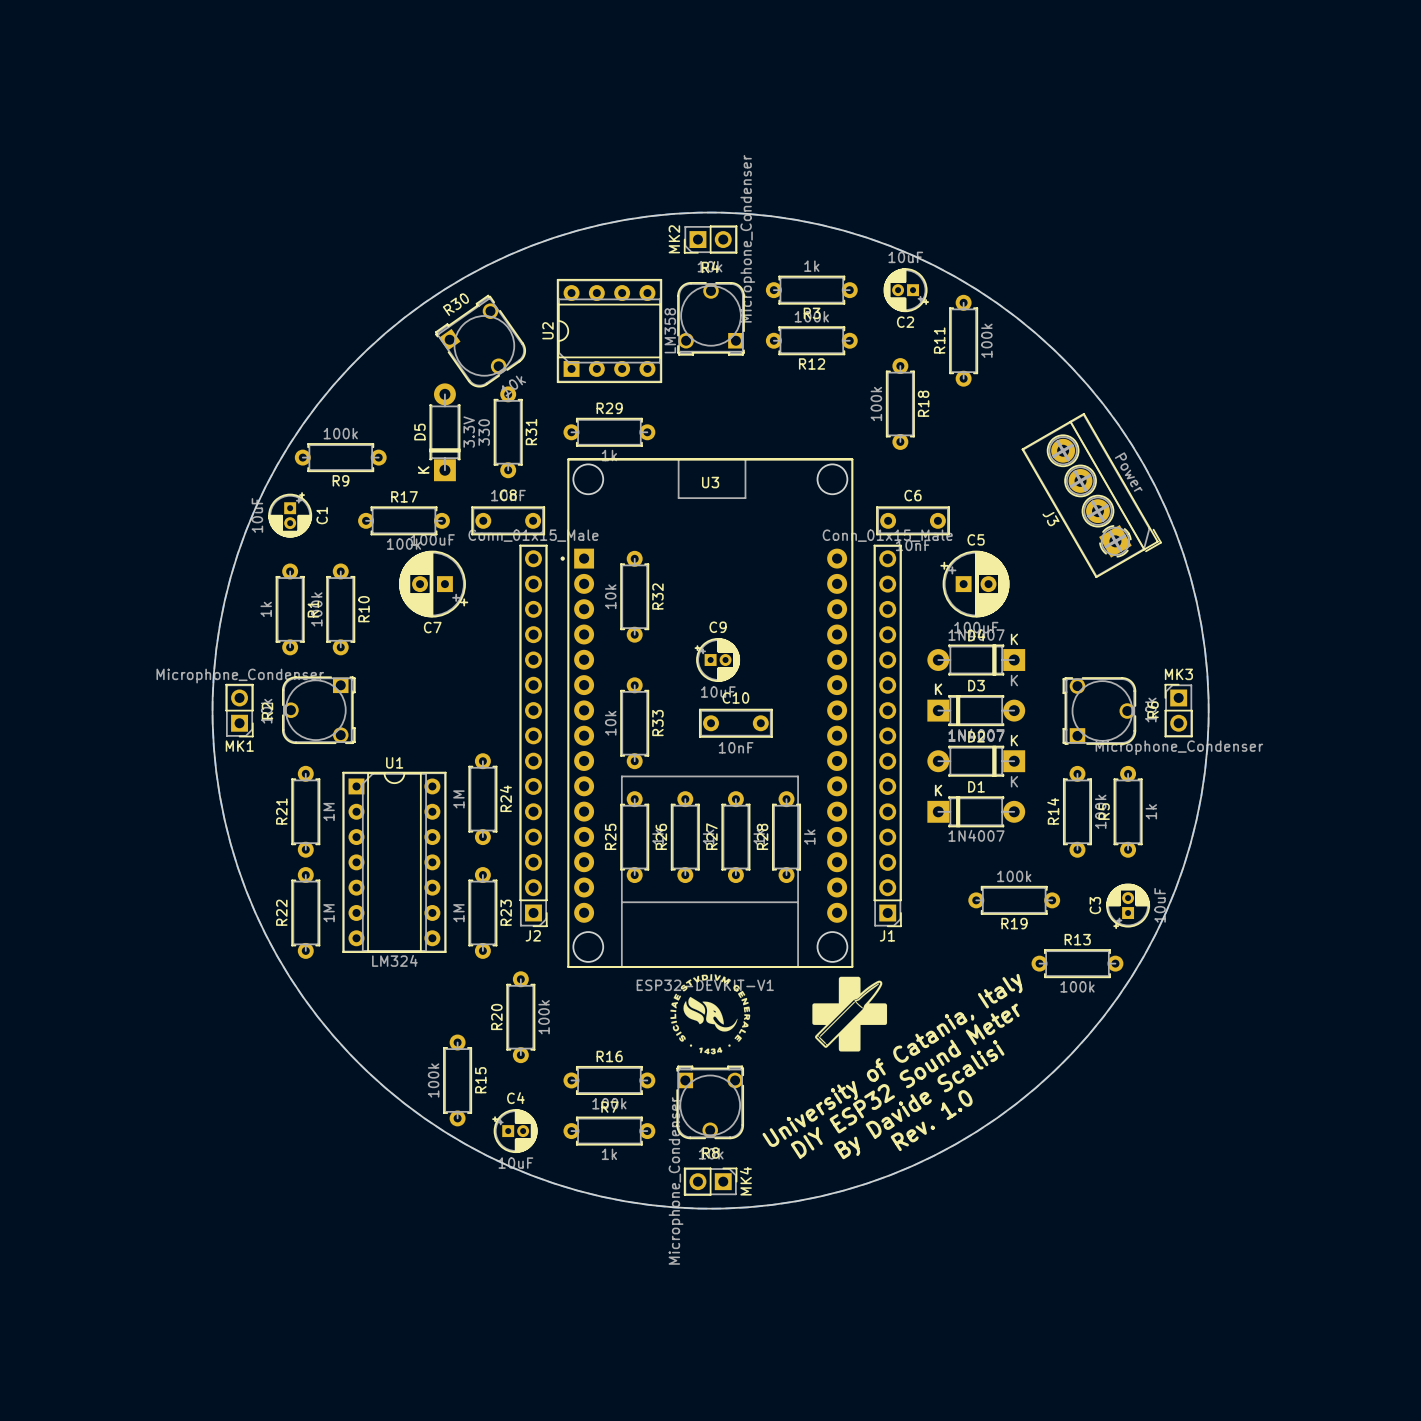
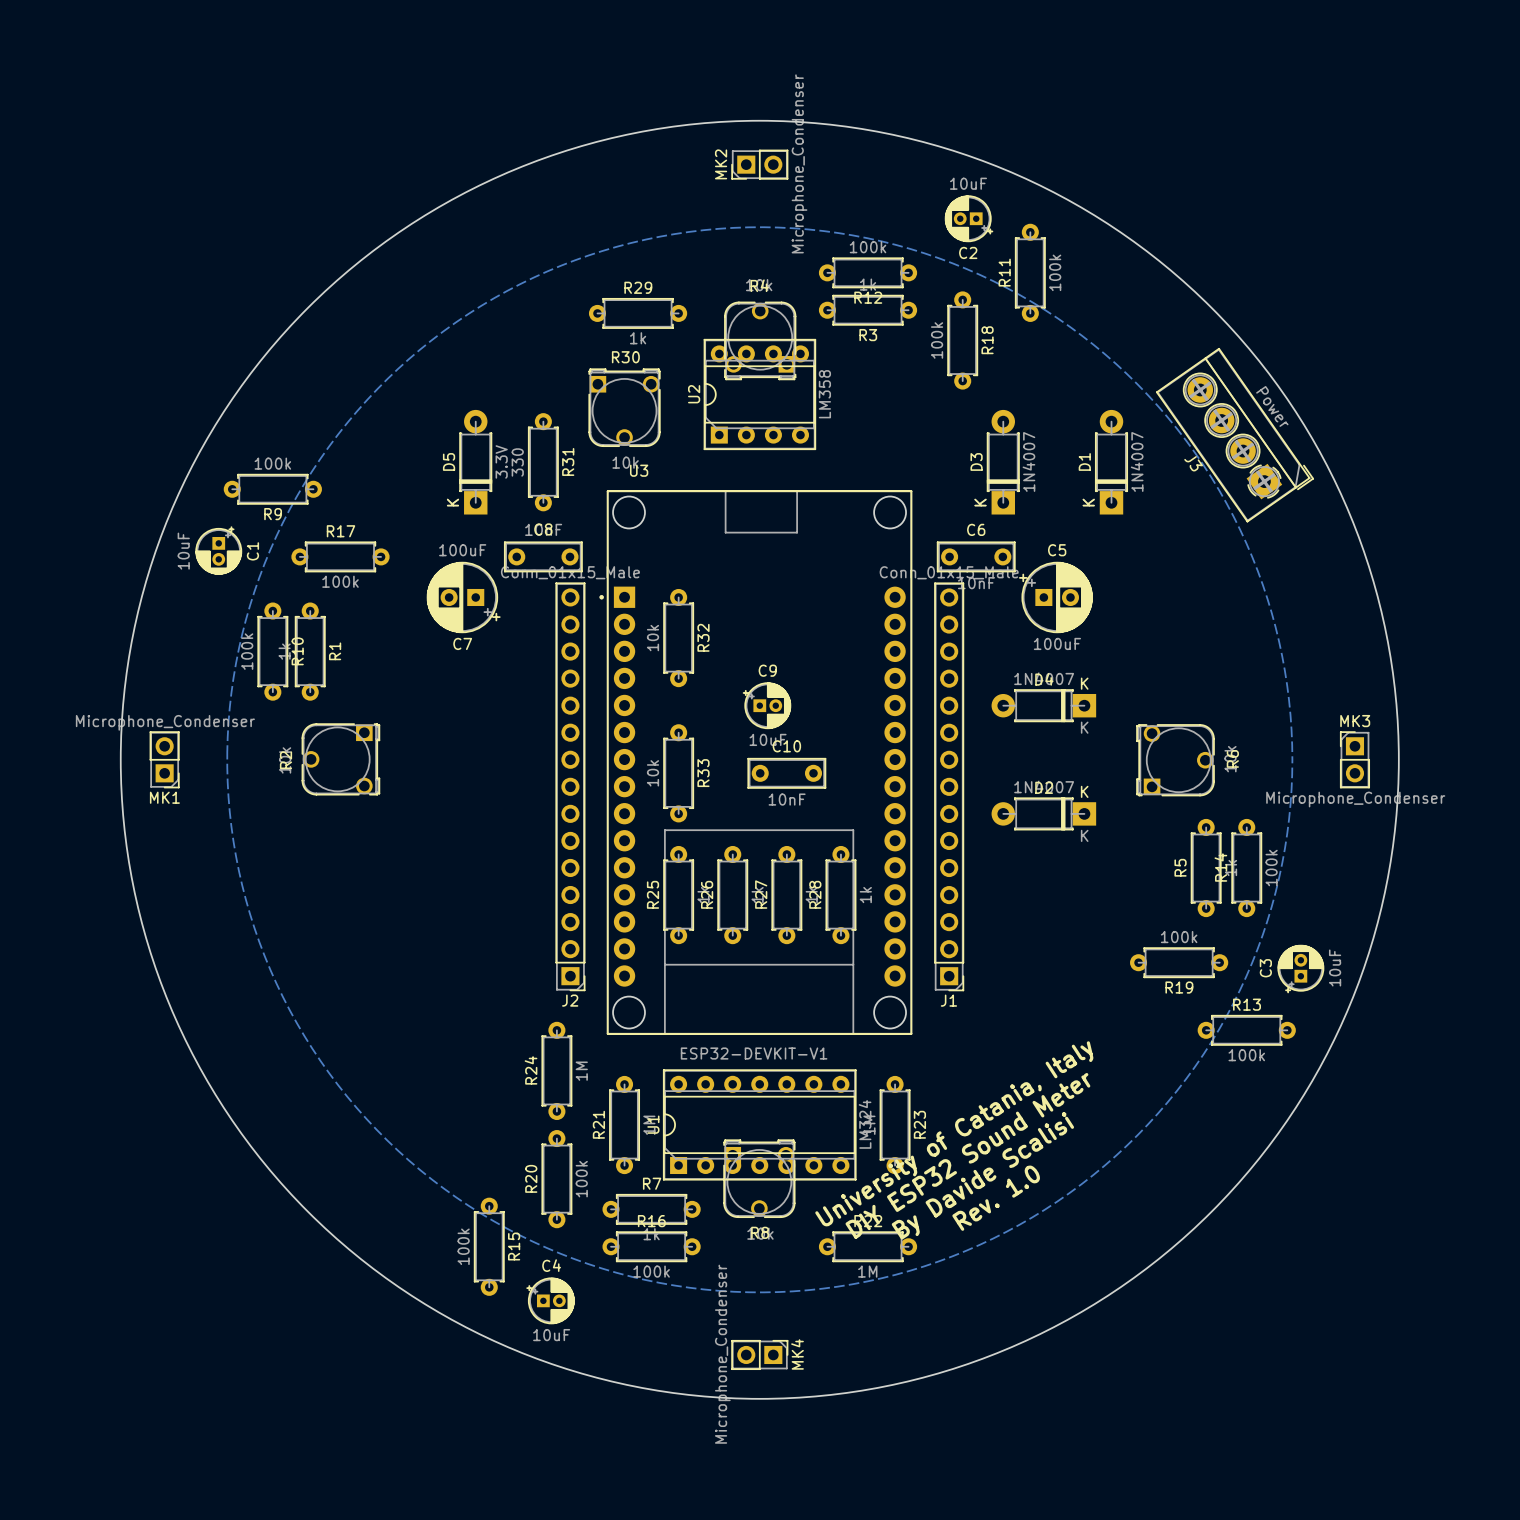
round board edge size: [212, 212, 1210, 1210] -> [120, 120, 1400, 1400]
MK2 position: (710, 239) -> (759, 164)
C2 position: (906, 290) -> (969, 218)
U2 position: (609, 330) -> (759, 394)
R12 position: (811, 340) -> (868, 272)
R11 position: (963, 340) -> (1030, 272)
R30 rotation: 0° (480, 341) -> 35° clockwise (624, 407)
R30 position: (480, 341) -> (624, 407)
R18 position: (900, 404) -> (962, 340)
R29 position: (609, 432) -> (638, 313)
R9 position: (340, 457) -> (272, 489)
U3 name position: U3 (710, 482) -> U3 (639, 470)
J3 rotation: 0° (1091, 495) -> 5° counterclockwise (1235, 435)
J3 position: (1091, 495) -> (1235, 435)
C1 position: (290, 514) -> (218, 550)
R17 position: (404, 520) -> (340, 556)
C7 position: (433, 584) -> (463, 597)
C5 position: (974, 584) -> (1055, 597)
R10 position: (340, 609) -> (272, 651)
MK1 position: (239, 710) -> (164, 759)
D3 rotation: 0° (976, 710) -> 90° counterclockwise (1003, 462)
D3 position: (976, 710) -> (1003, 462)
MK3 position: (1178, 710) -> (1354, 759)
R24 name position: R24 (505, 798) -> R24 (531, 1070)
R24 value position: 1M (458, 799) -> 1M (581, 1071)
R24 position: (482, 799) -> (556, 1070)
R21 position: (305, 811) -> (624, 1125)
D1 rotation: 0° (976, 811) -> 90° counterclockwise (1111, 462)
D1 position: (976, 811) -> (1111, 462)
R14 position: (1077, 811) -> (1246, 868)
U1 rotation: 0° (394, 862) -> 90° counterclockwise (759, 1124)
U1 position: (394, 862) -> (759, 1124)
R19 position: (1014, 900) -> (1179, 962)
C3 position: (1128, 906) -> (1300, 969)
R22 rotation: 0° (305, 912) -> 90° clockwise (868, 1246)
R22 position: (305, 912) -> (868, 1246)
R23 position: (482, 912) -> (895, 1125)
R13 position: (1077, 963) -> (1246, 1030)
drawing: [670, 974, 751, 1055] -> none
drawing: [812, 976, 888, 1052] -> none
R20 position: (520, 1017) -> (556, 1179)
R15 position: (457, 1080) -> (489, 1246)
R16 position: (609, 1080) -> (651, 1246)
C4 position: (514, 1131) -> (550, 1300)
MK4 position: (710, 1181) -> (759, 1354)

